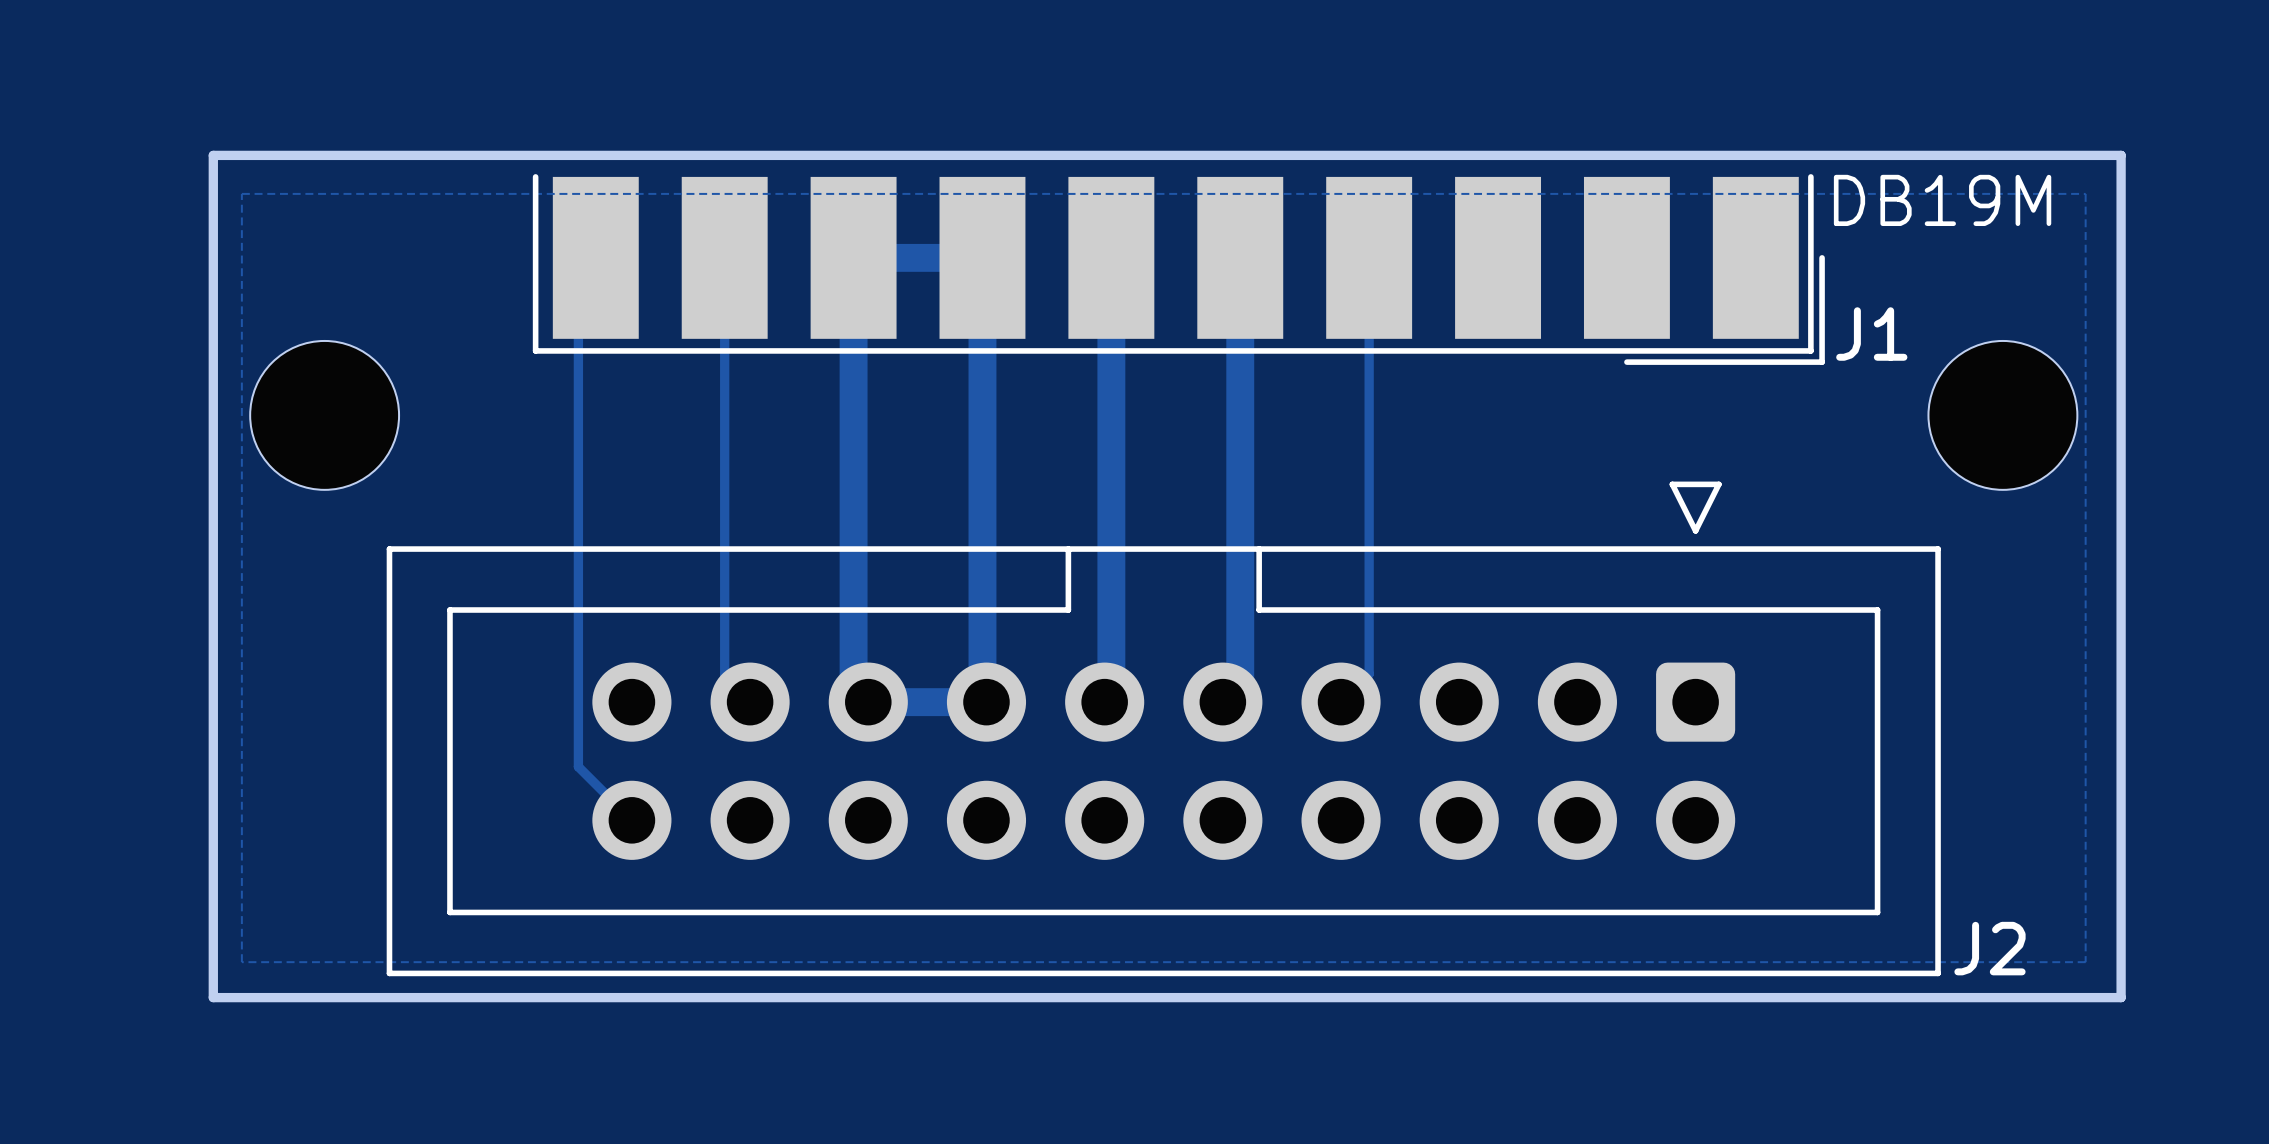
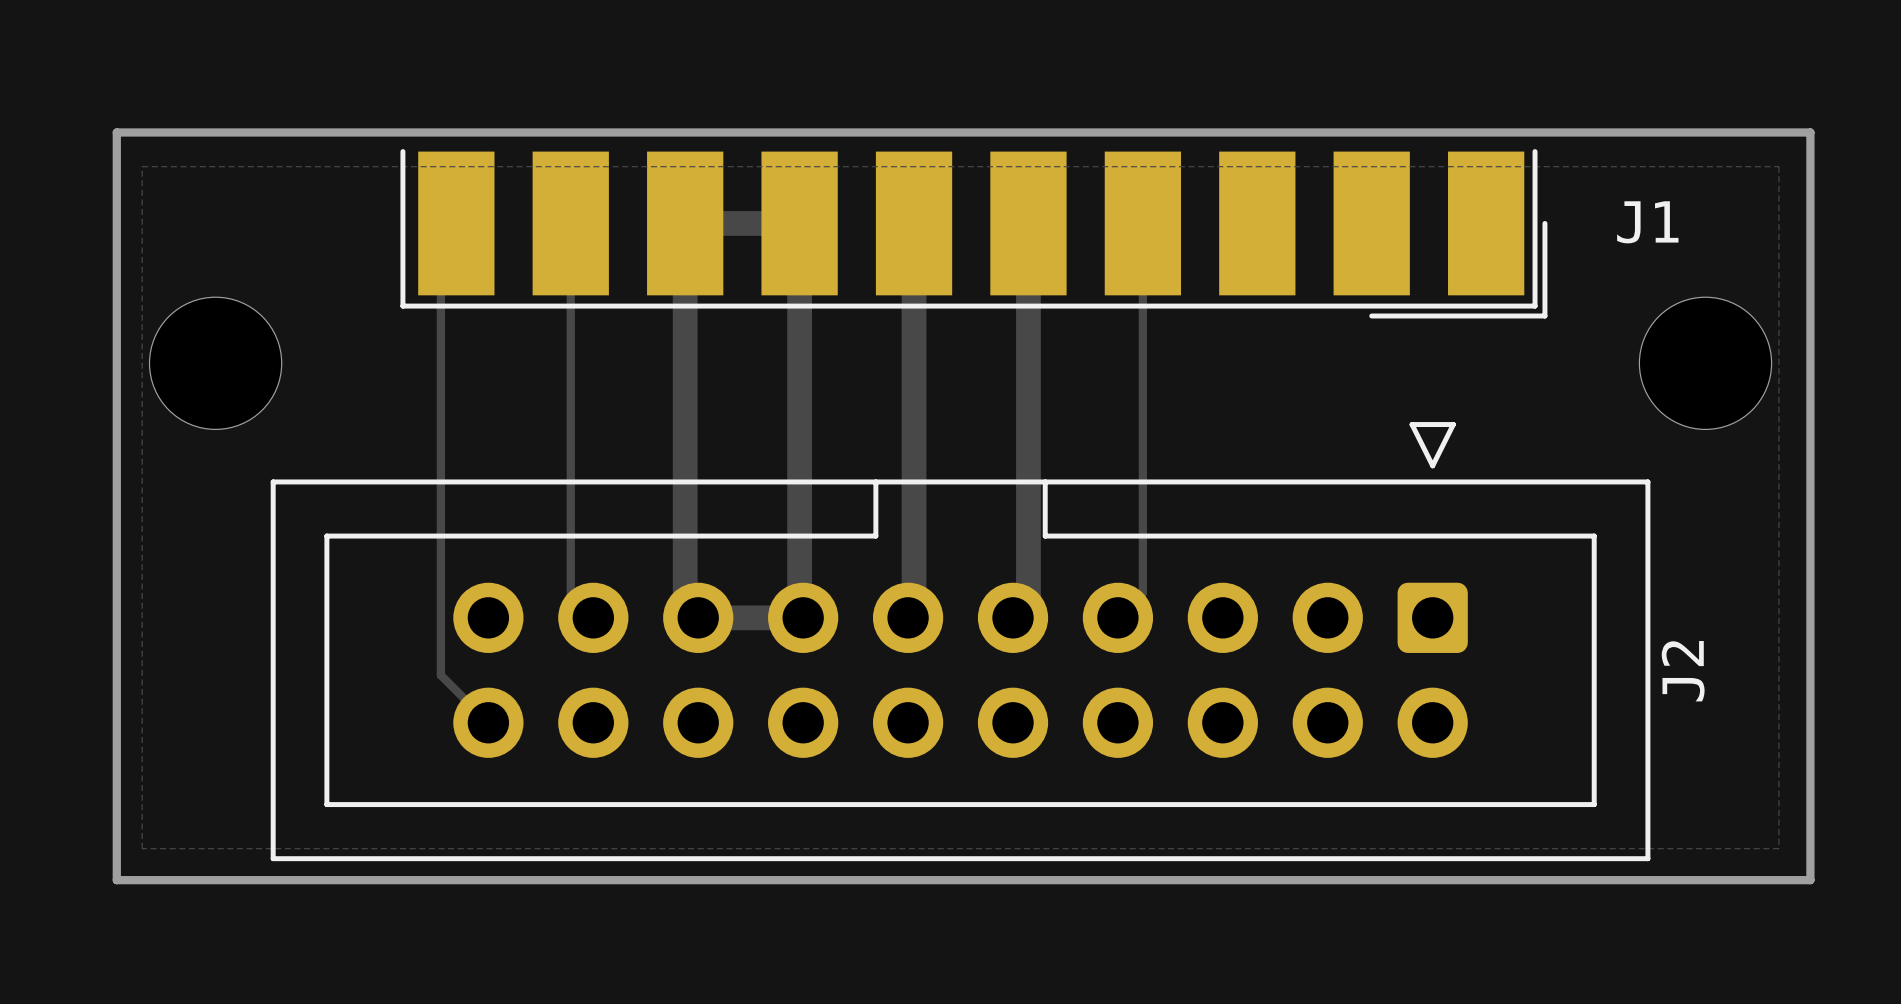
text: DB19M (1942, 200) -> none
J1 name position: J1 (1871, 334) -> J1 (1647, 222)
J2 name rotation: 0° (1989, 948) -> 90° counterclockwise (1683, 671)
J2 name position: J2 (1989, 948) -> J2 (1683, 671)

